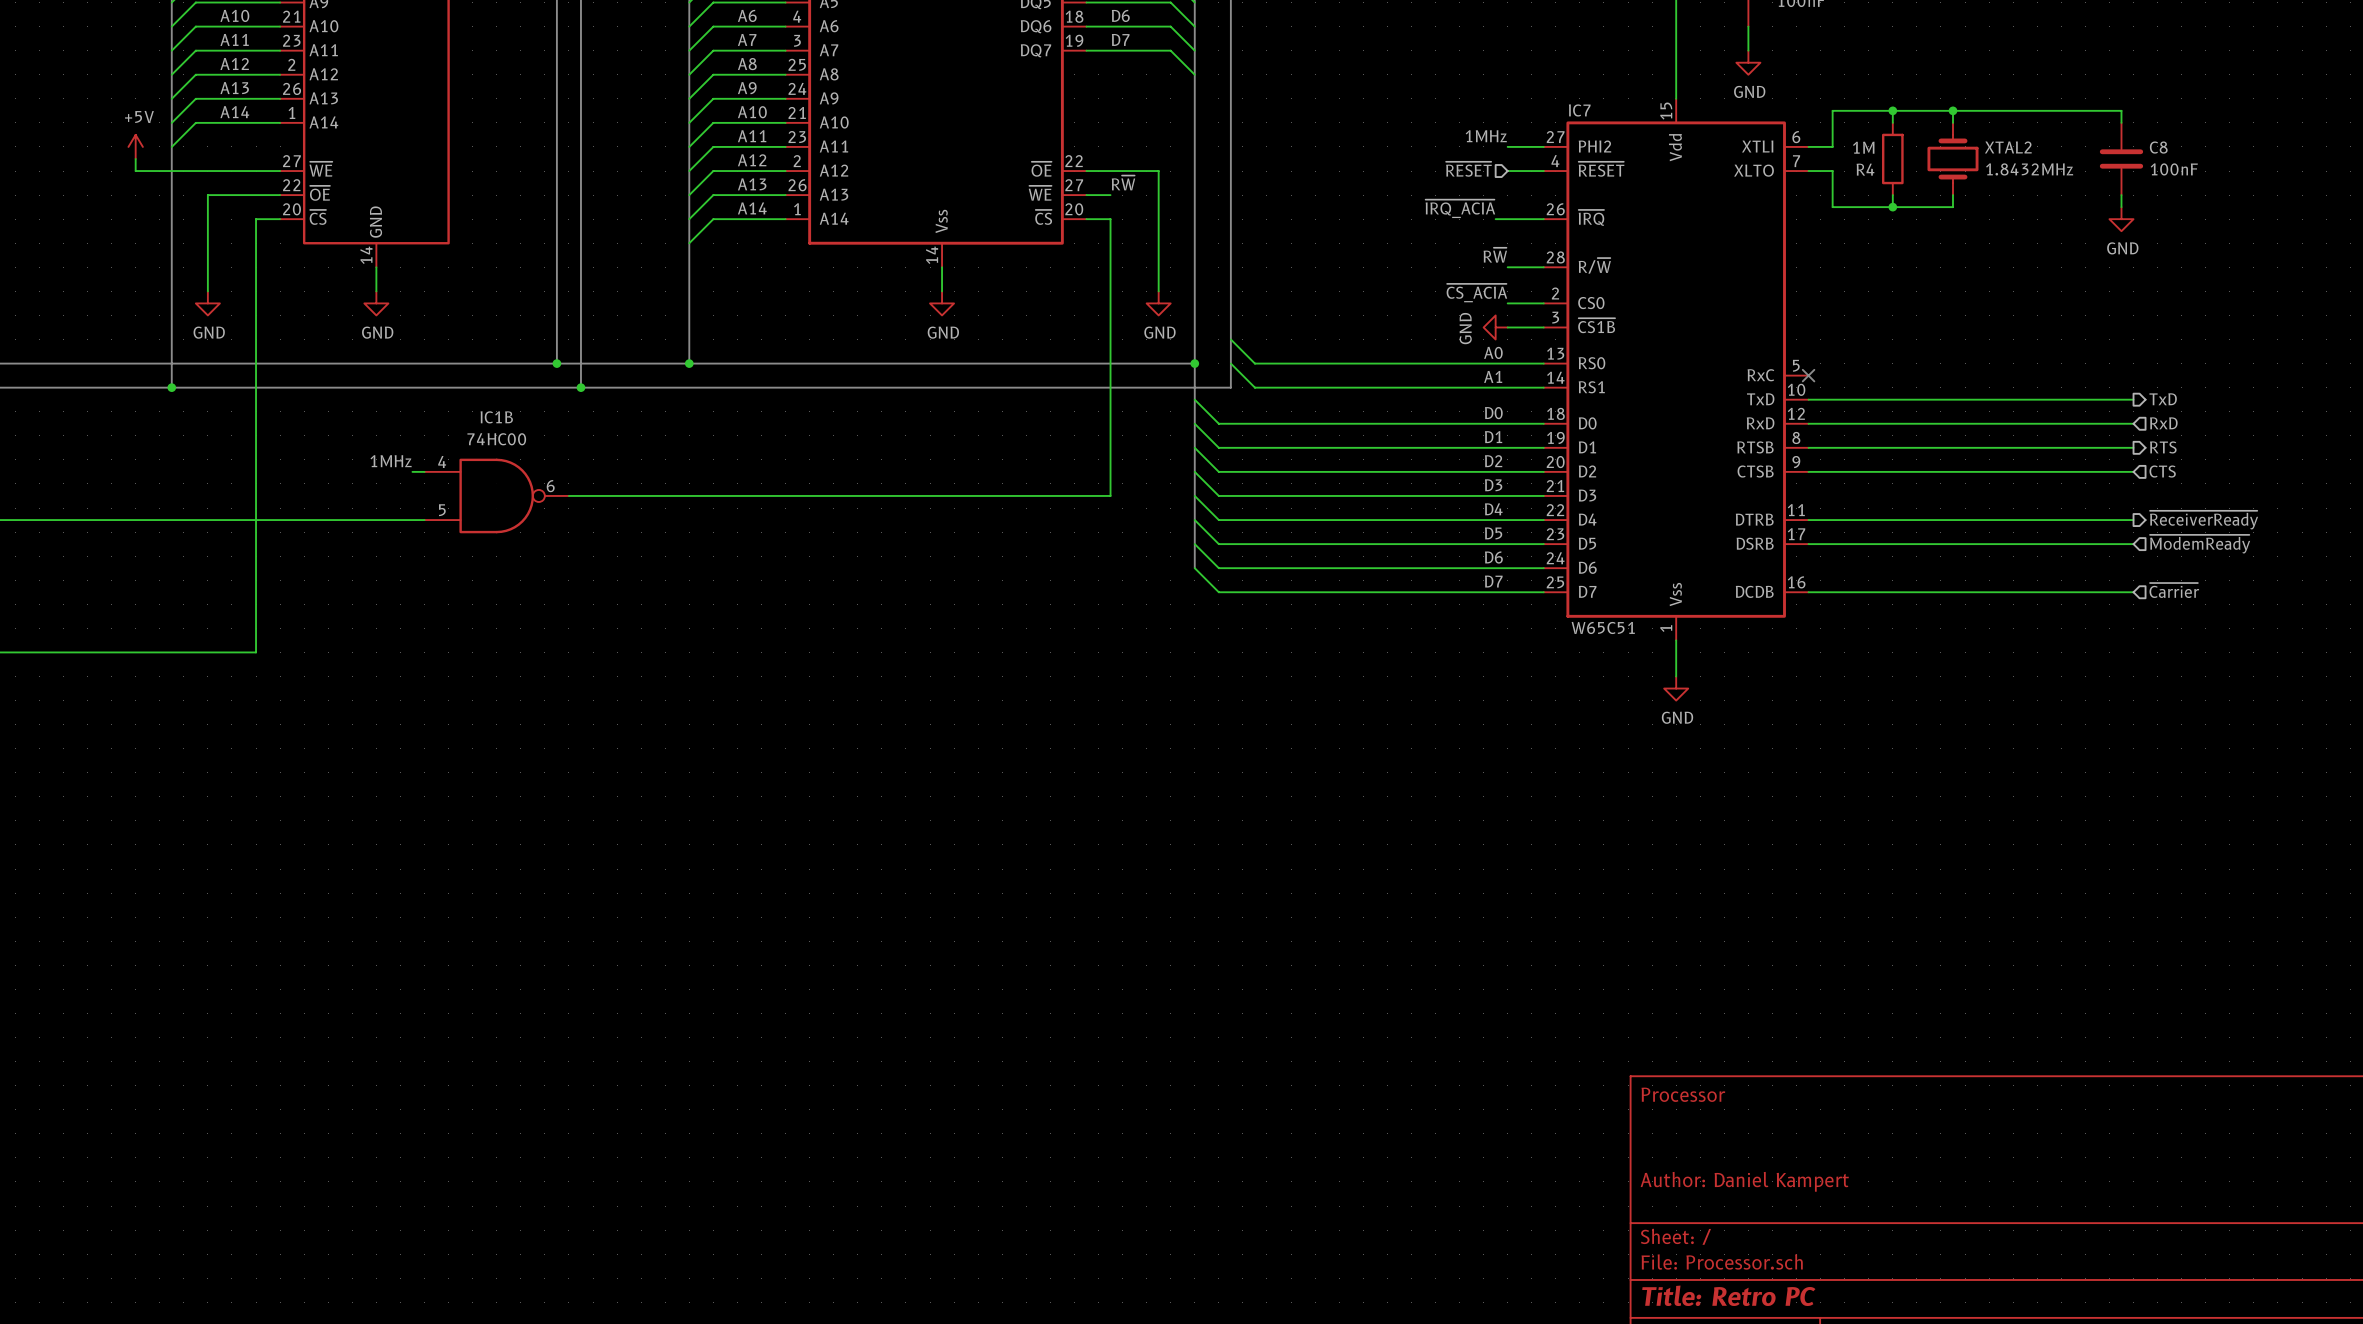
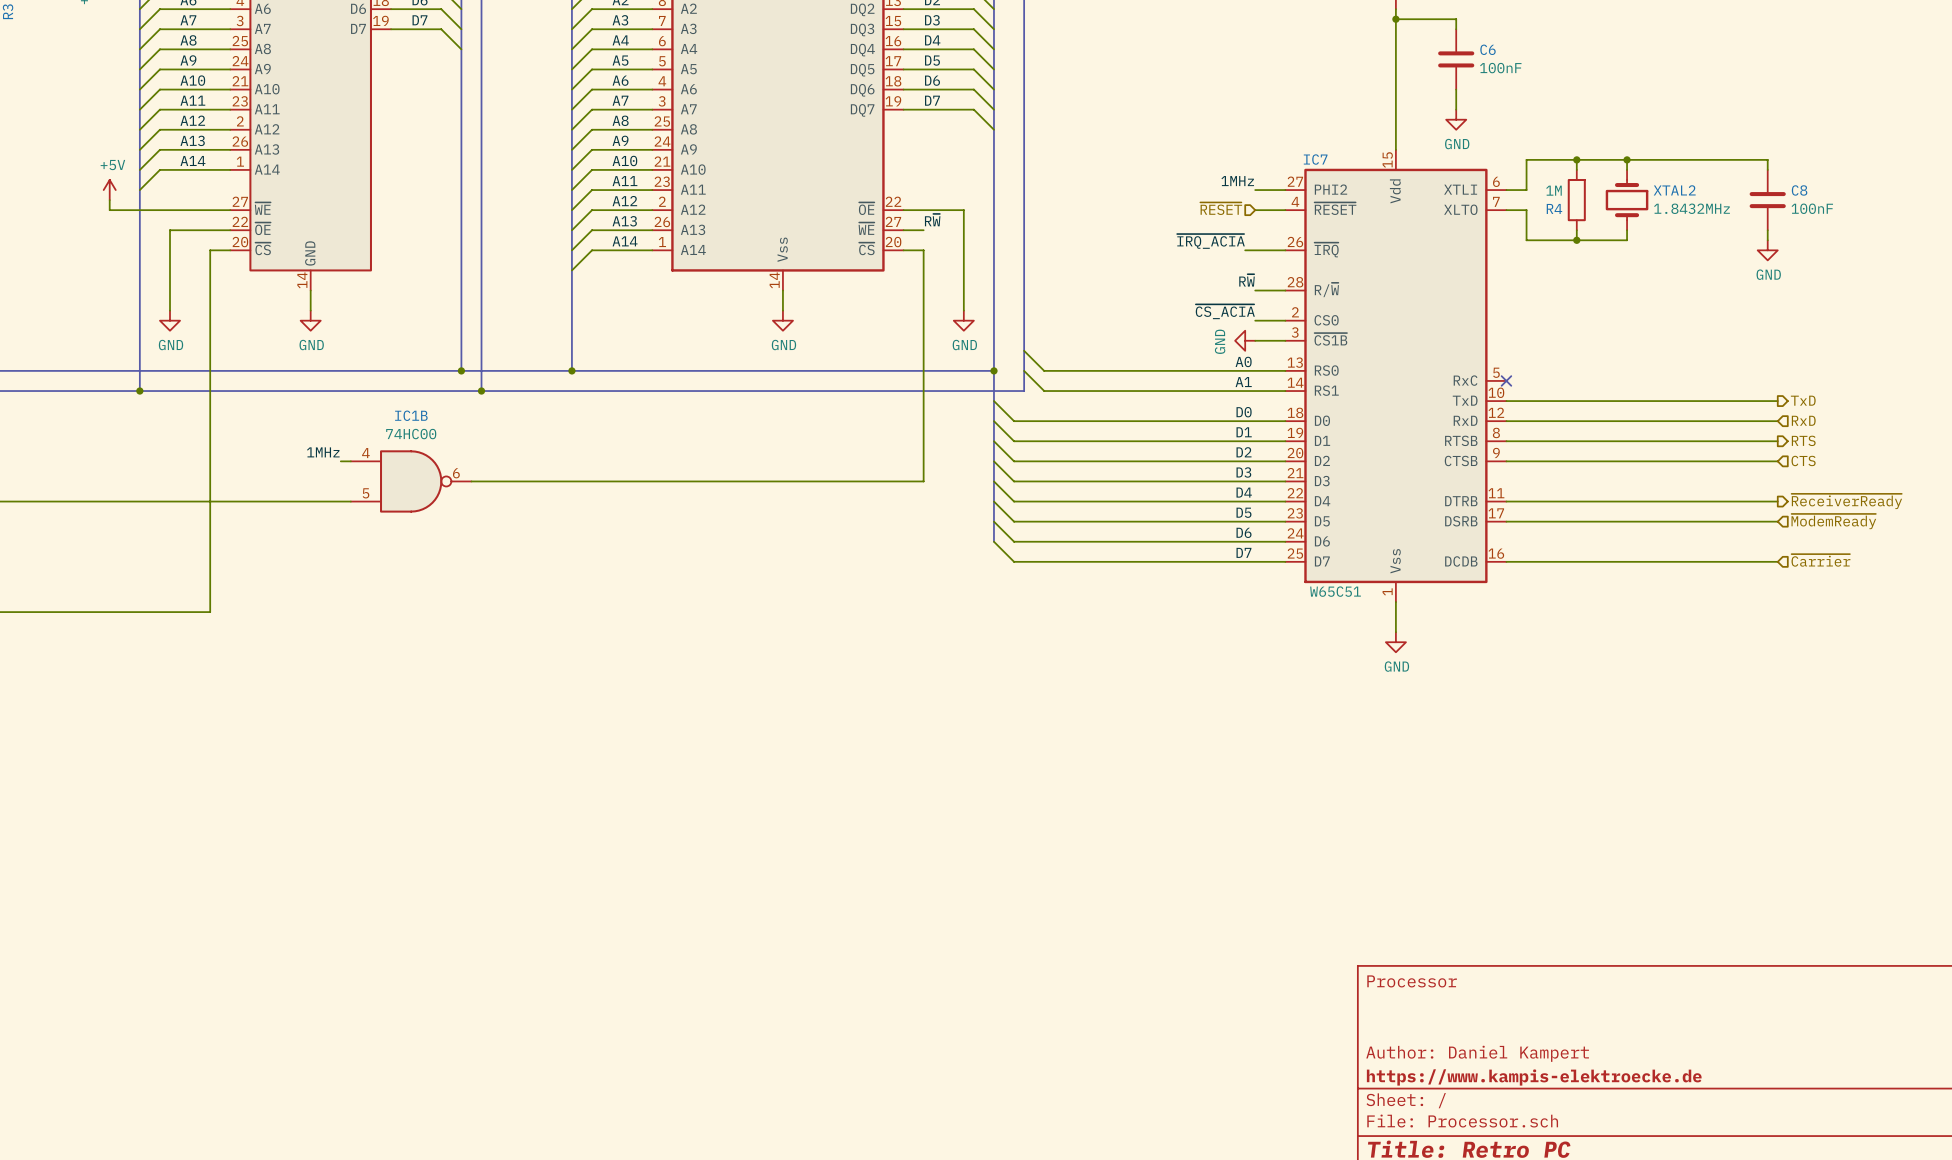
title block: none -> https://www.kampis-elektroecke.de (1534, 1077)

